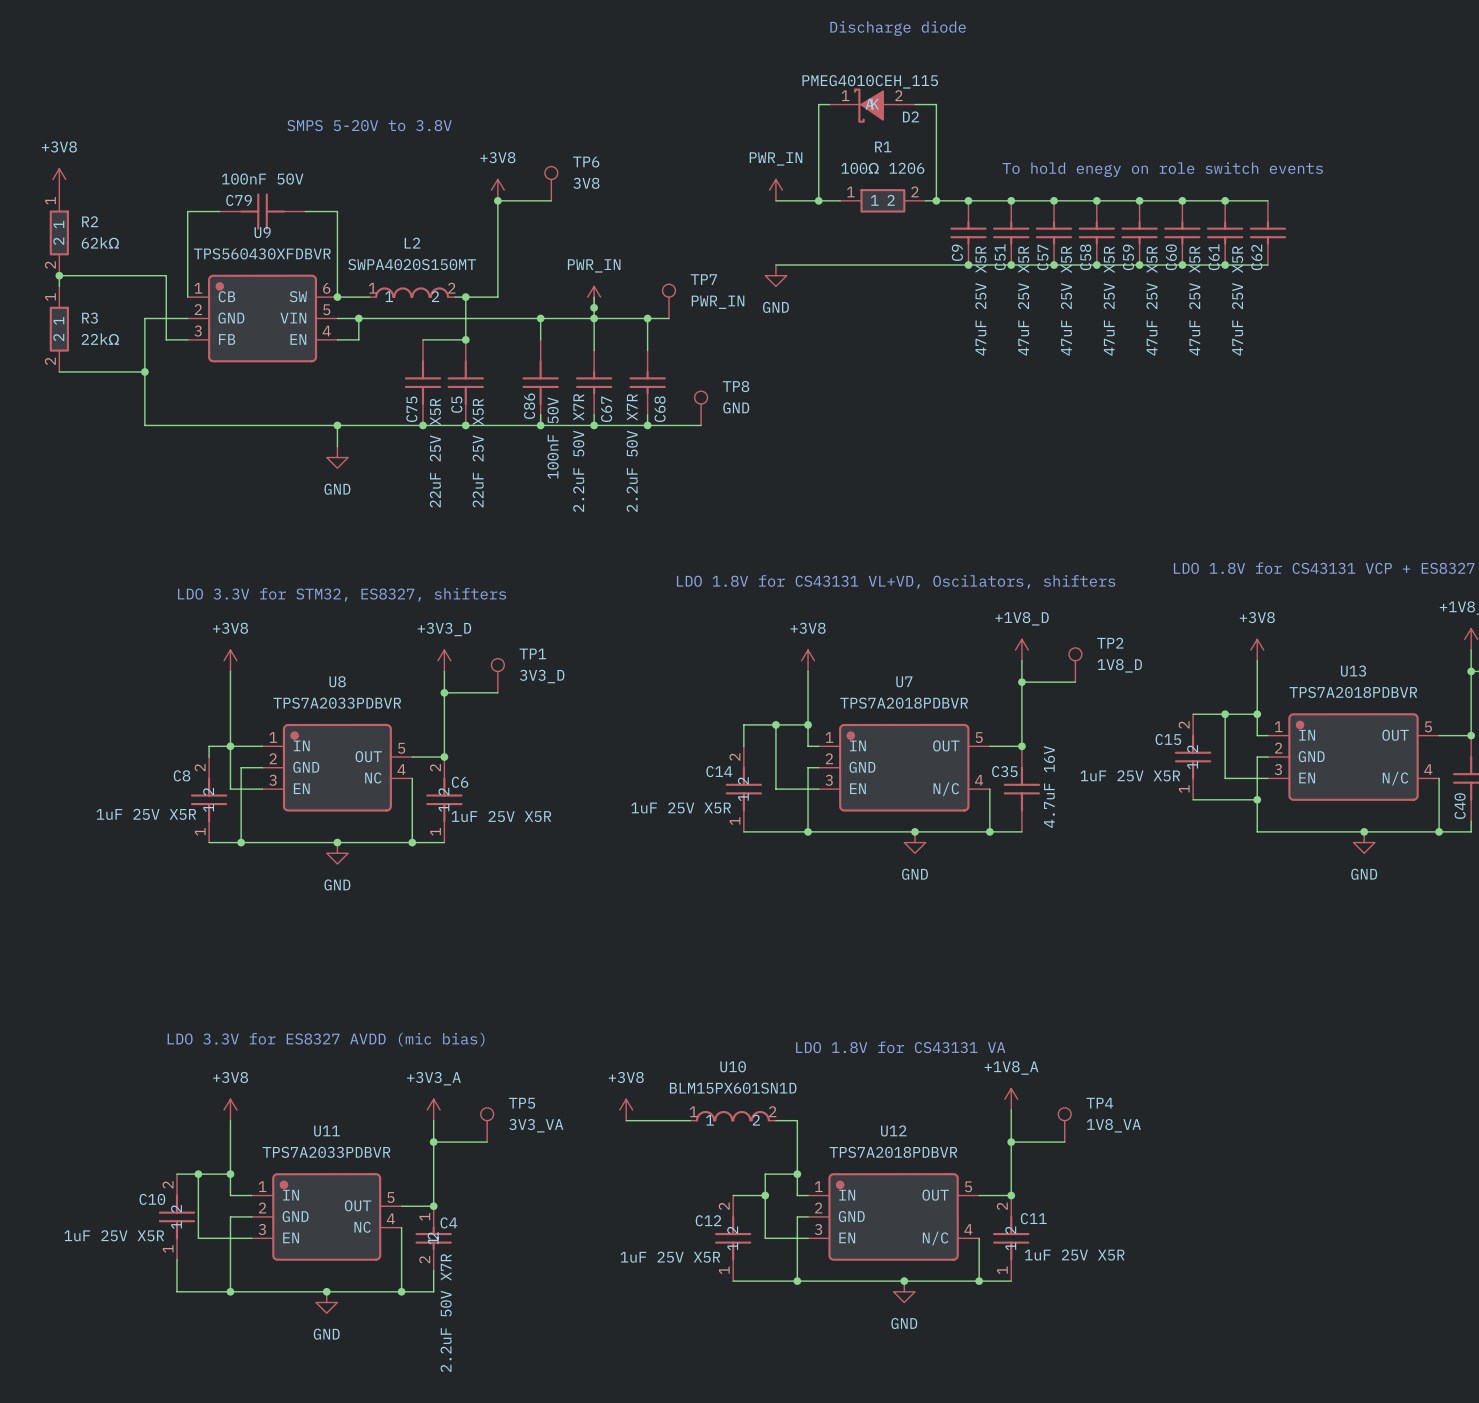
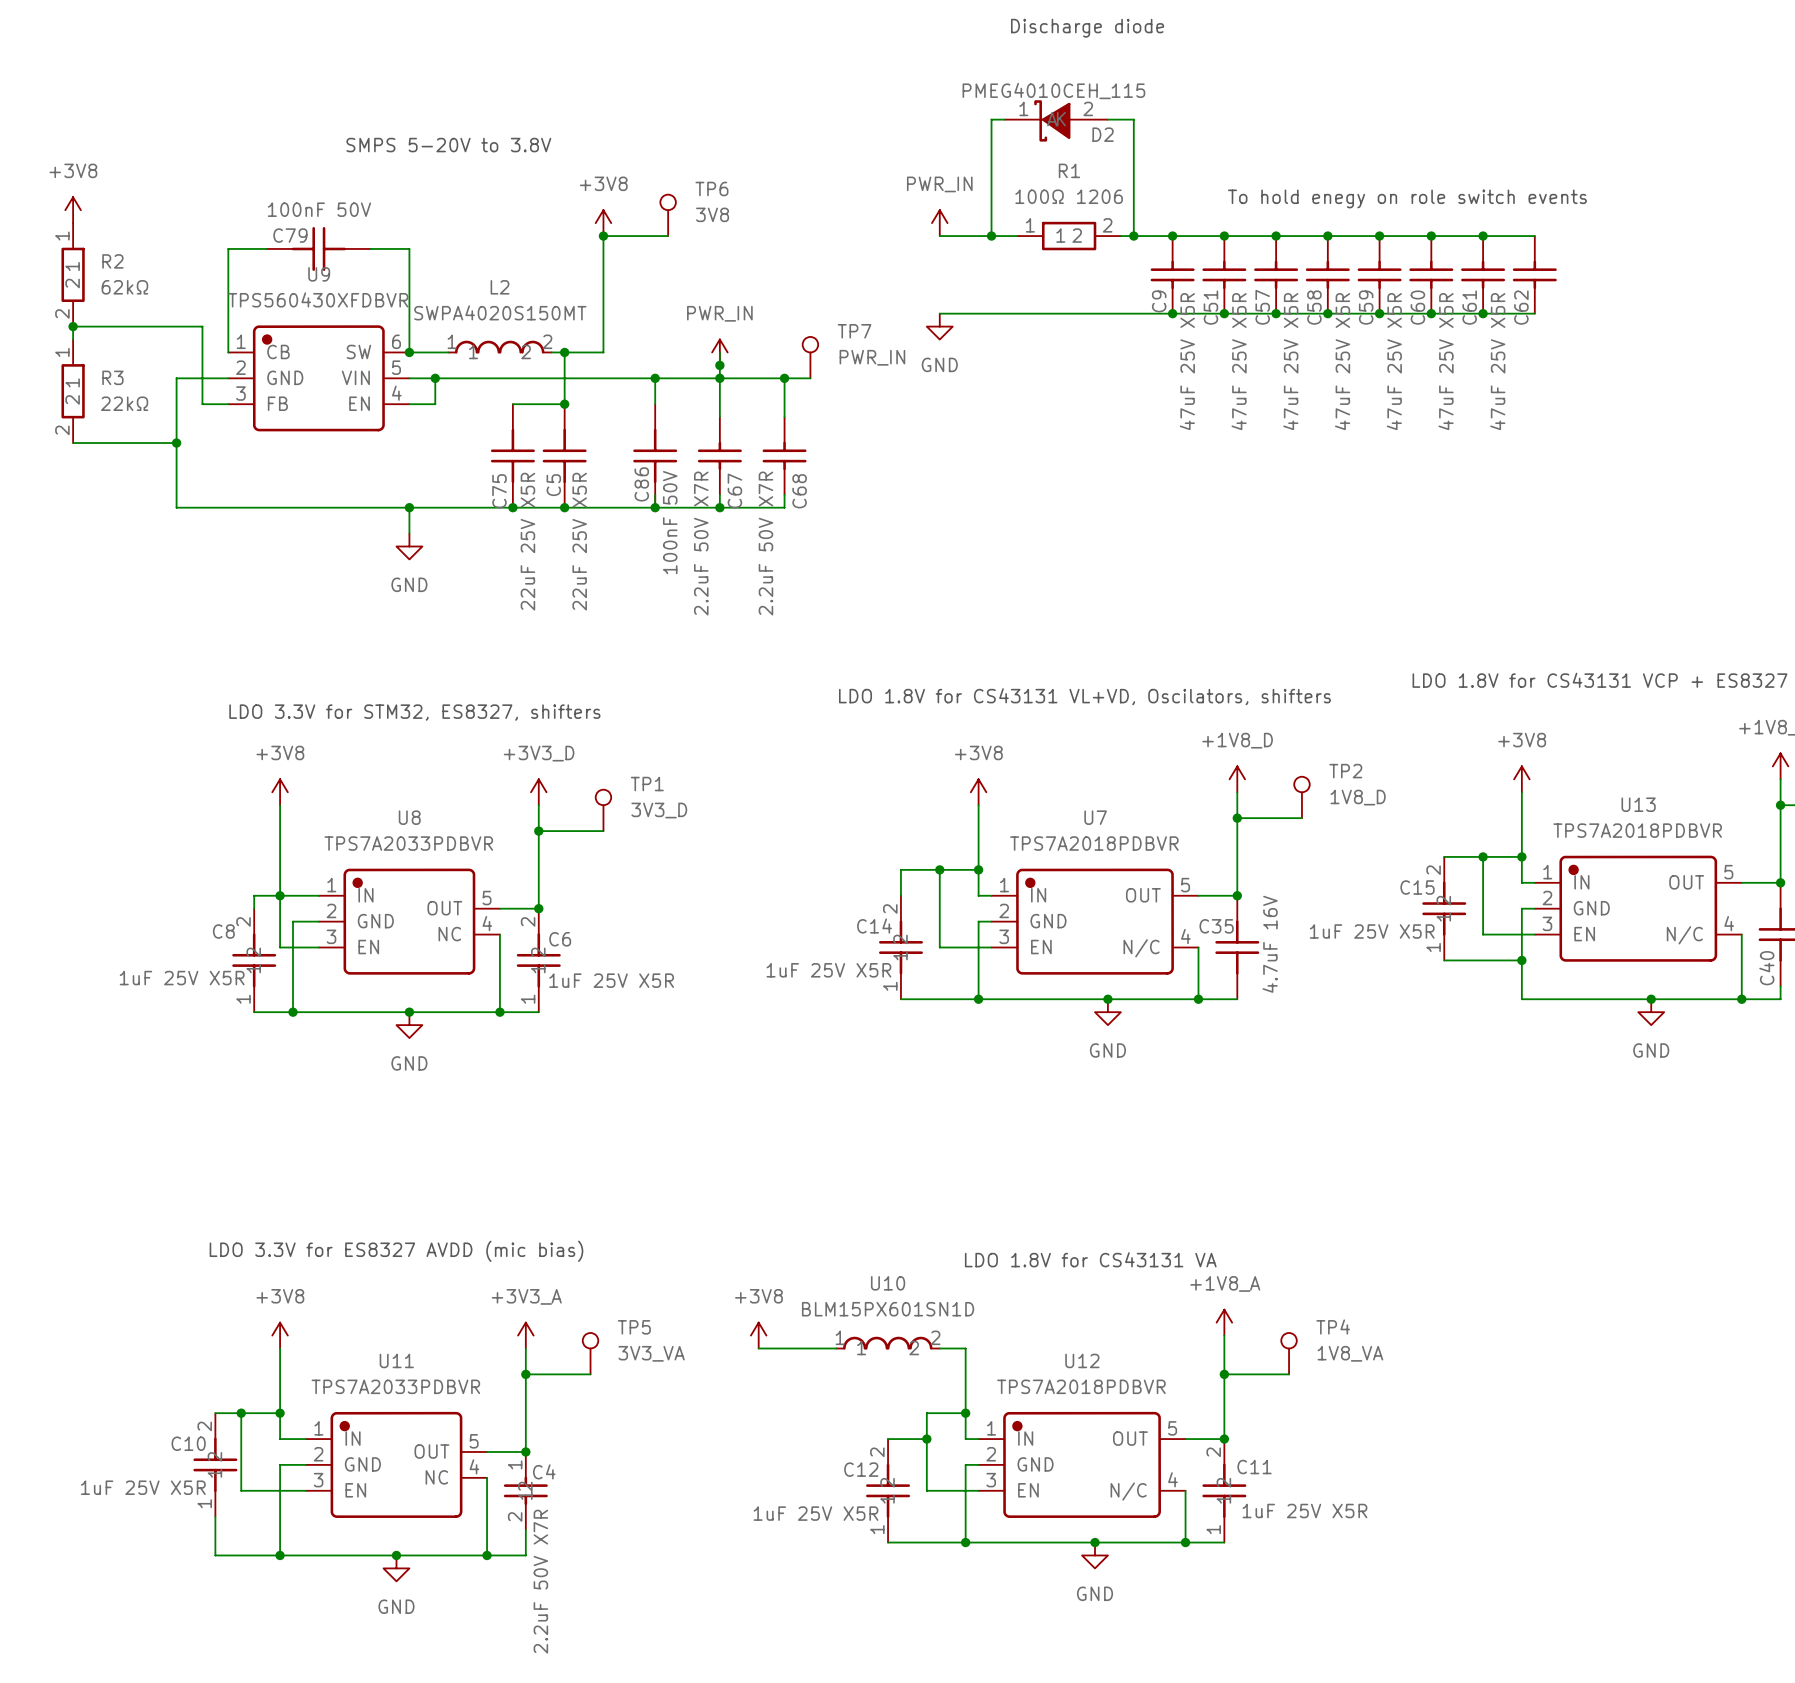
TP8: GND (701, 408) -> none
wire: (647, 425) (701, 425) -> none
junction: (647, 425) -> none

